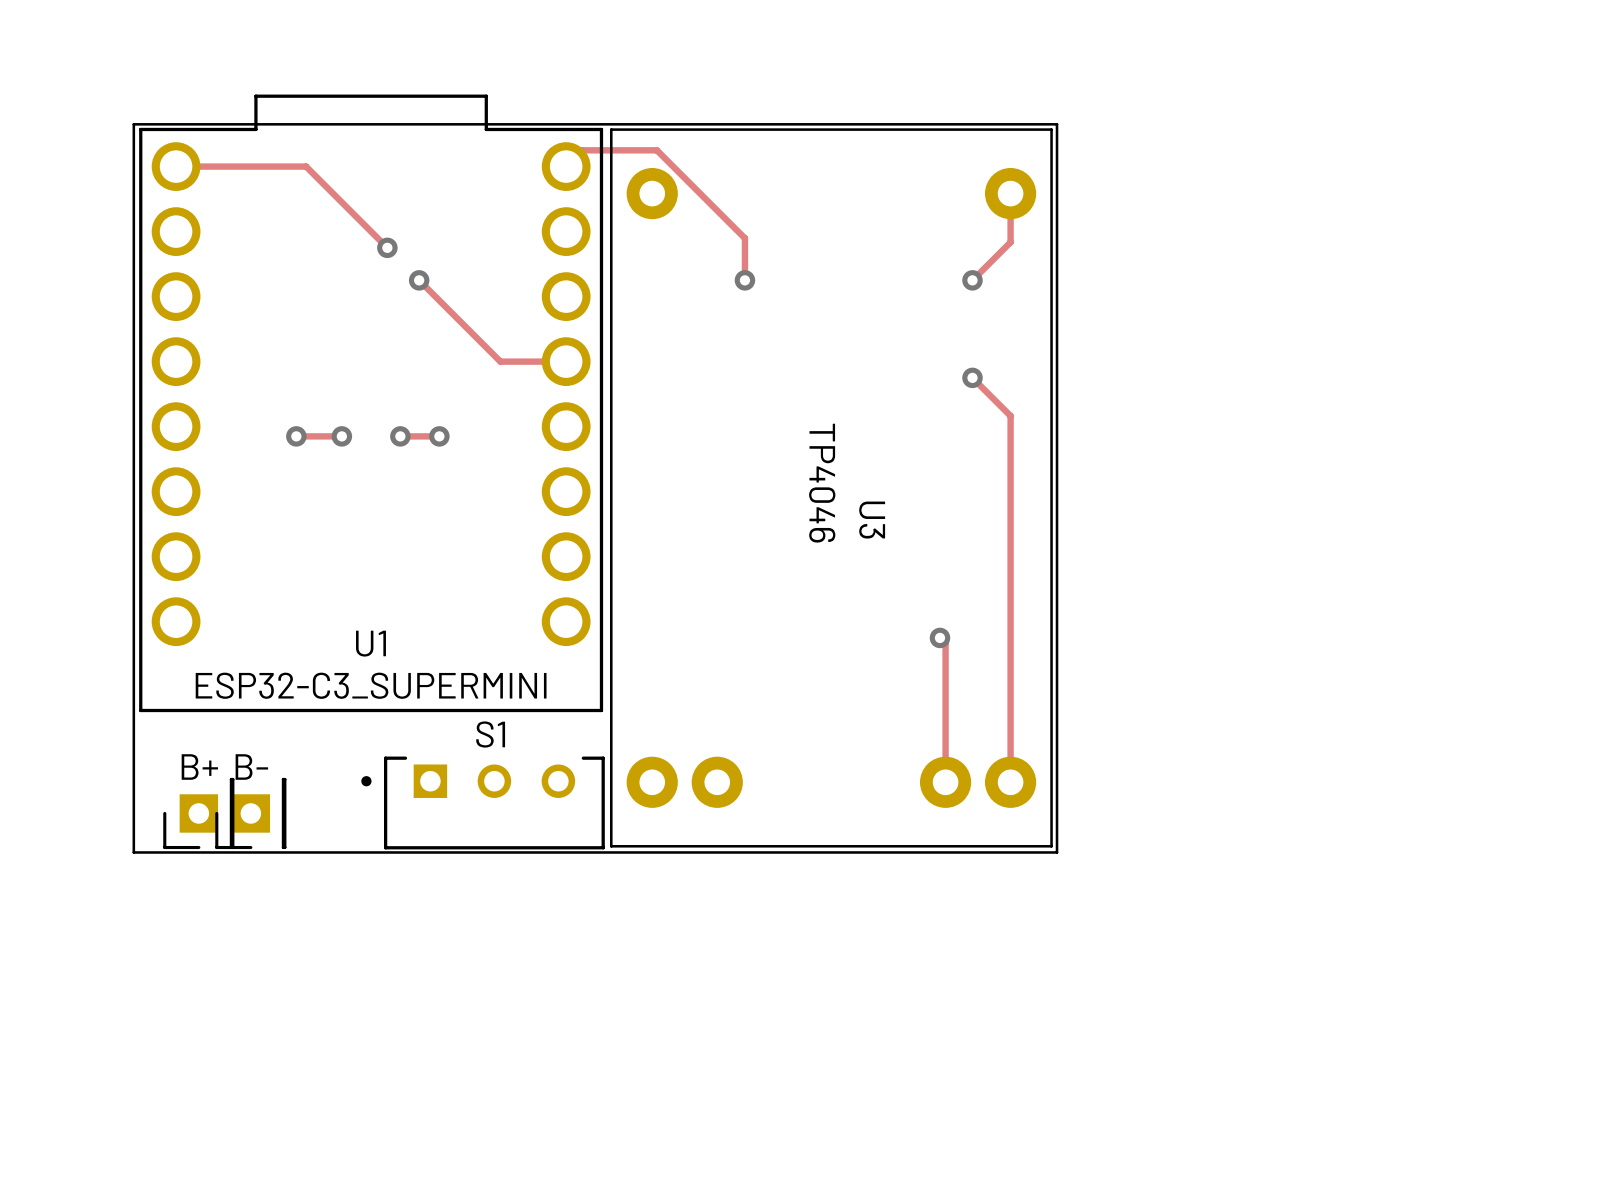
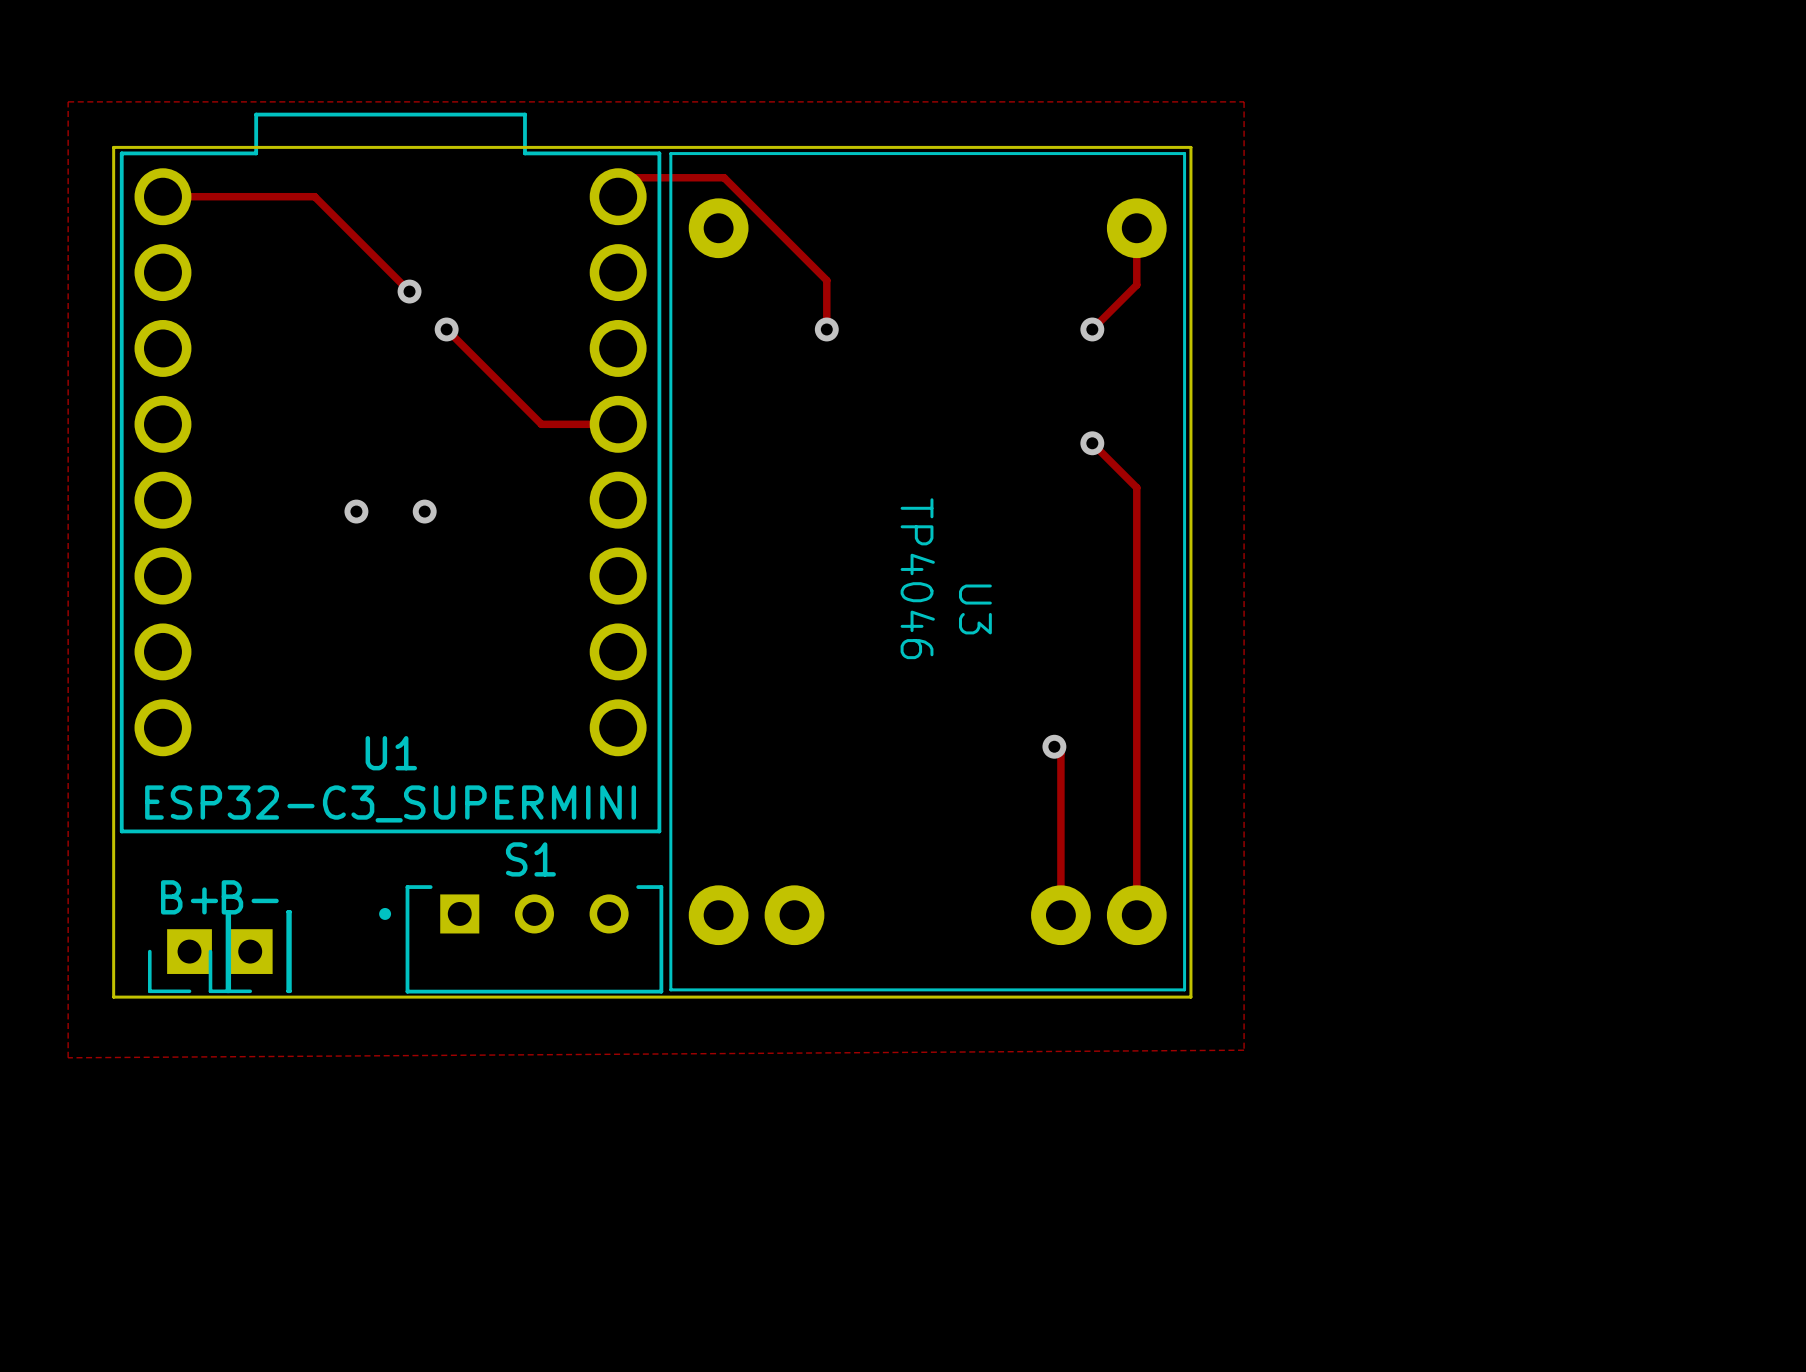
zone outline: none -> (68, 101) (1244, 101) (1244, 1050) (68, 1057) (68, 101)
track: (296, 436) (341, 436) -> none
via: (296, 436) -> none
track: (400, 436) (439, 436) -> none
via: (439, 436) -> none

